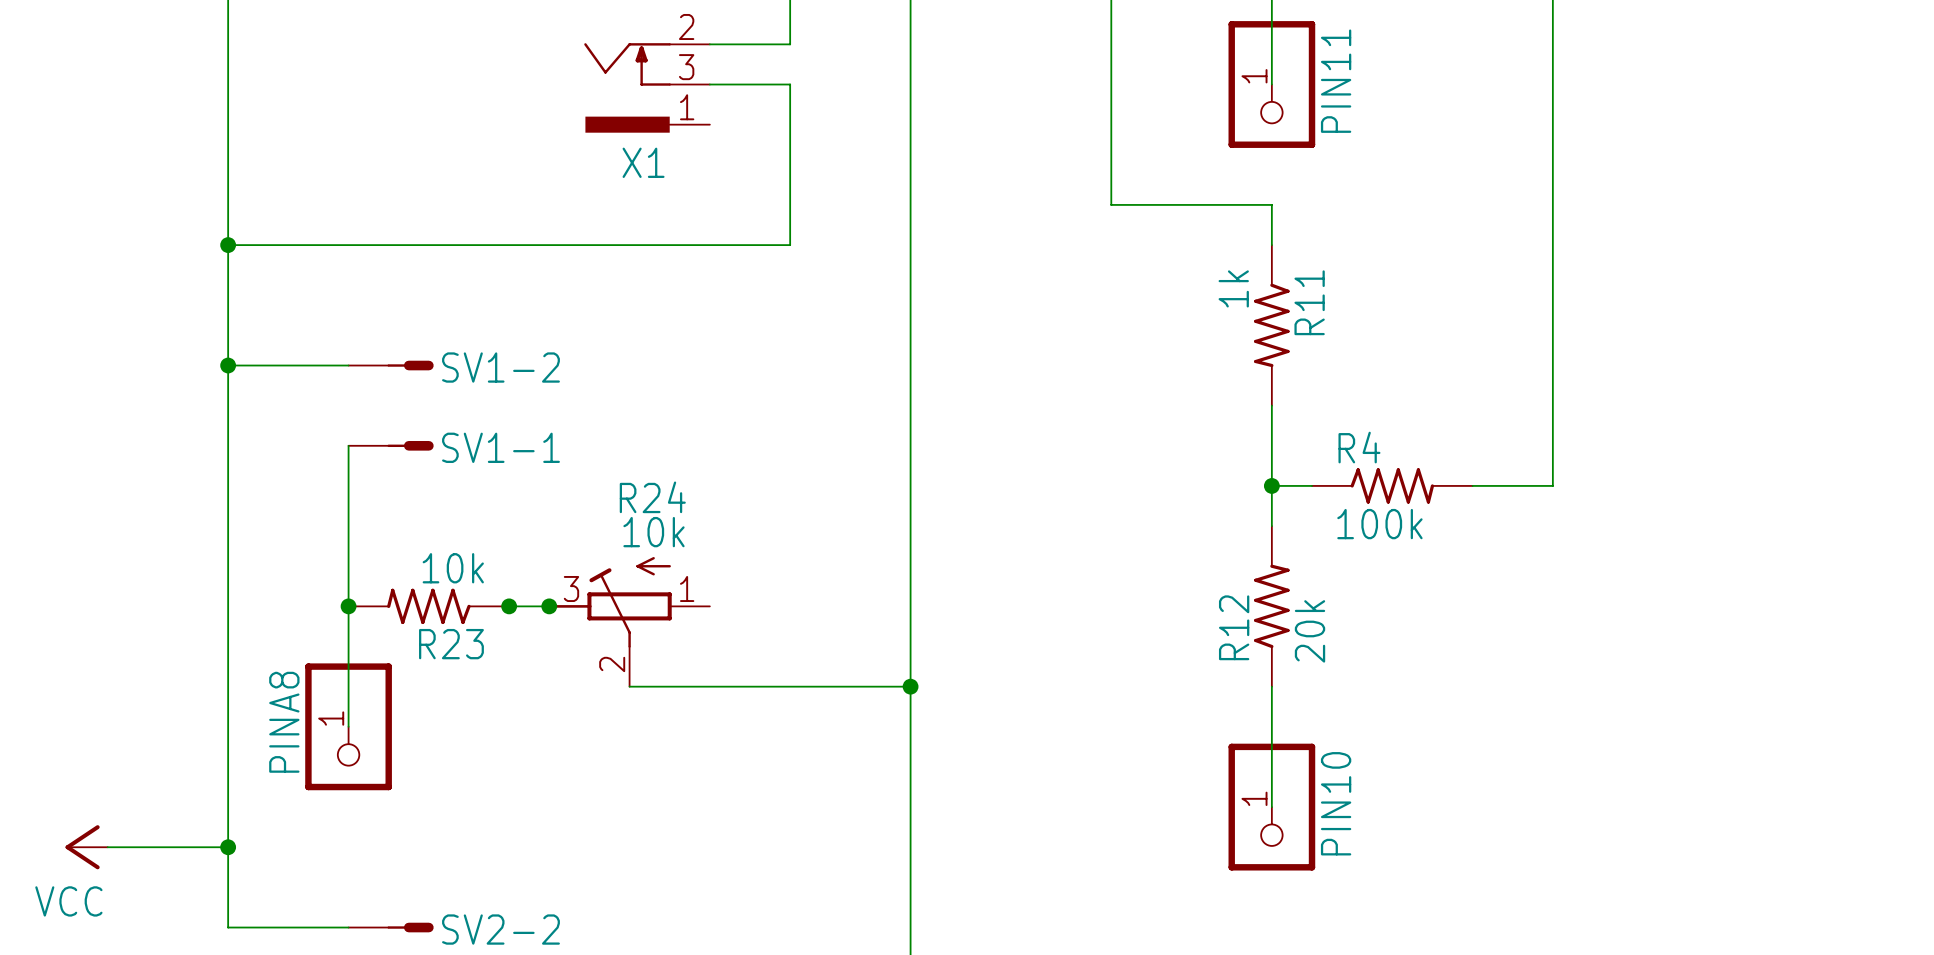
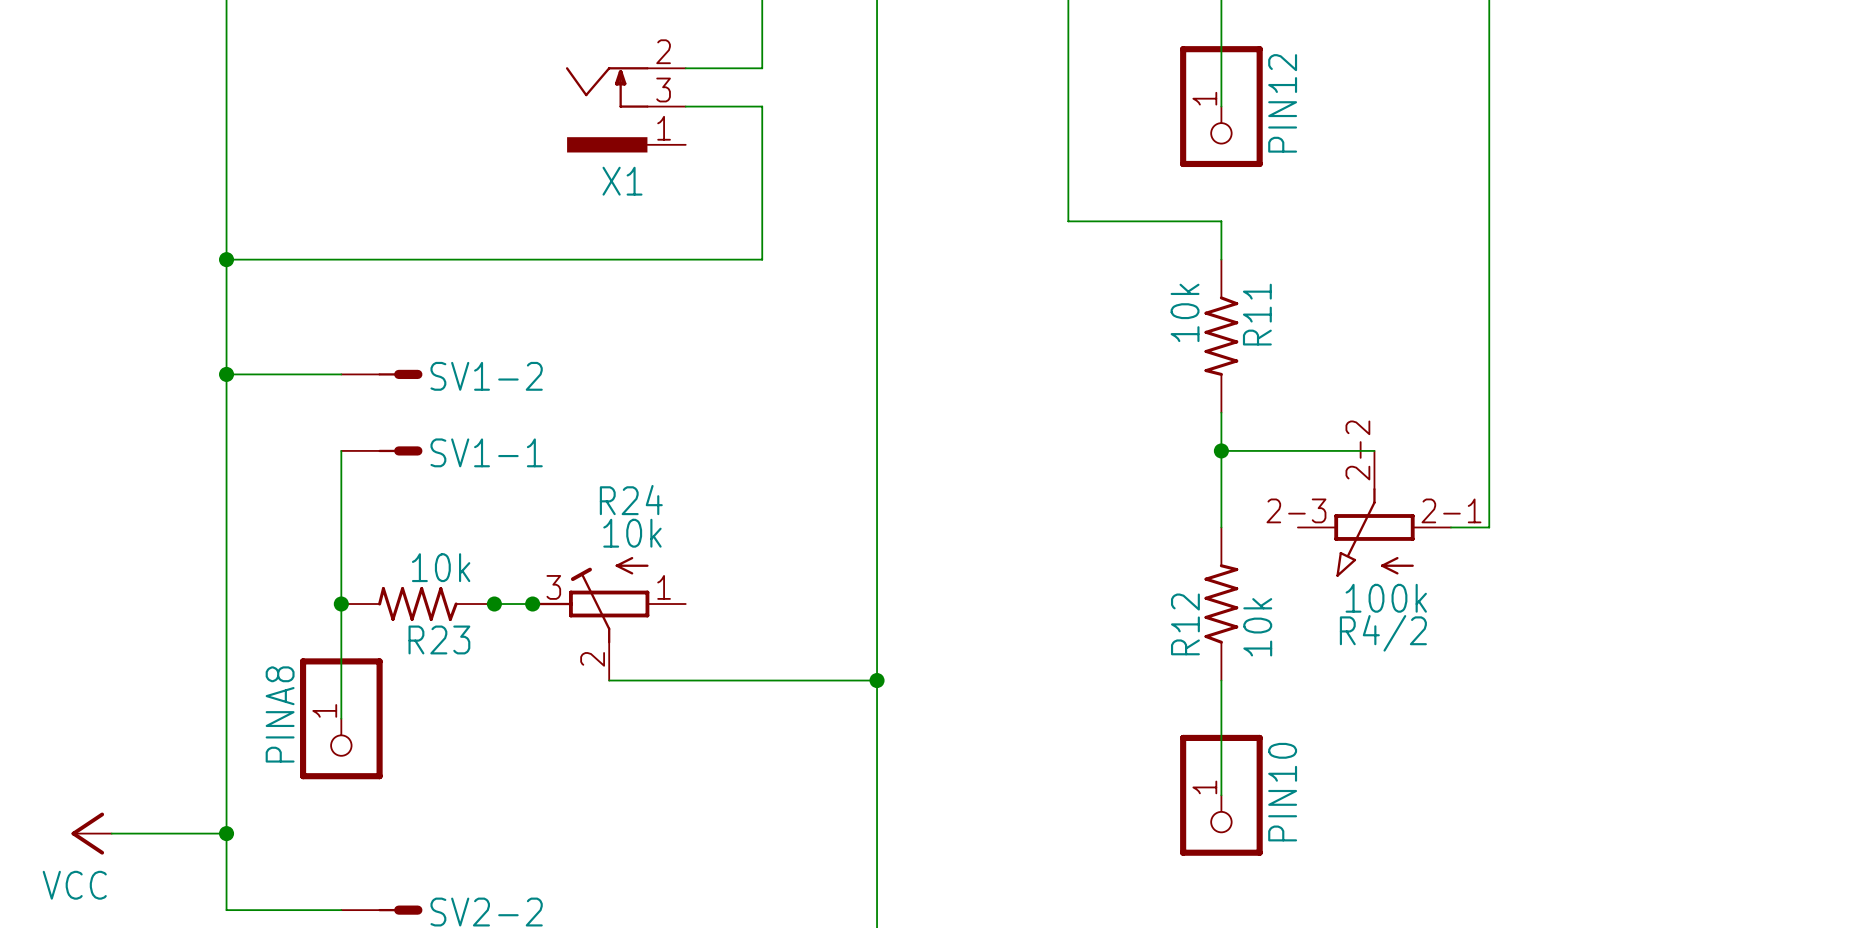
PIN11 name: PIN11 (1336, 81) -> PIN12 (1282, 103)
R11 value: 1k (1233, 288) -> 10k (1185, 312)
wire: none -> (1221, 450) (1374, 450)
wire: (1271, 485) (1312, 485) -> none
junction position: (1271, 485) -> (1221, 450)
R4: 100k (1392, 485) -> none
wire: (1472, 485) (1552, 485) -> (1450, 527) (1489, 527) (1489, 489)
R4/2: none -> 100k (1374, 513)
R12 value: 20k (1310, 631) -> 10k (1257, 627)

